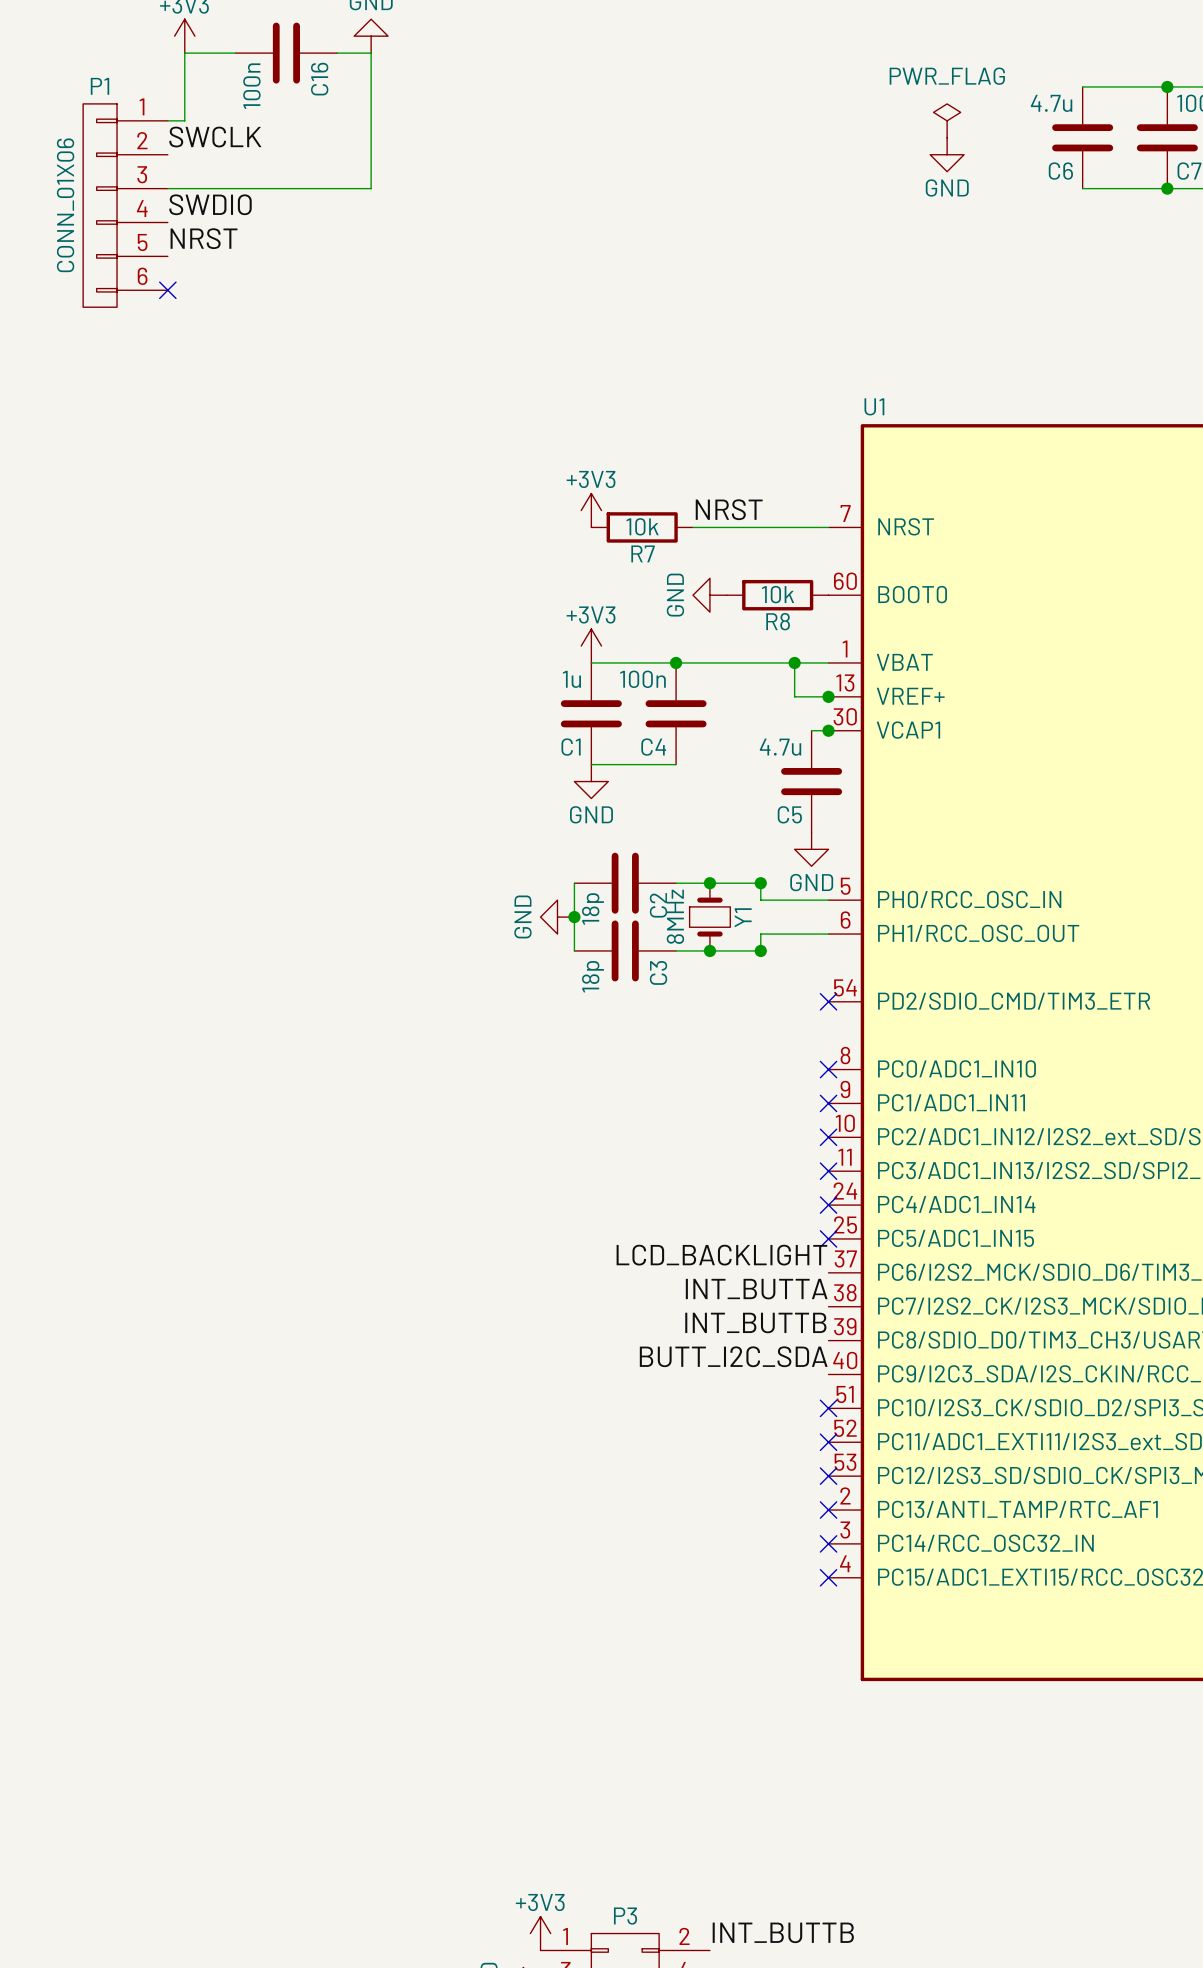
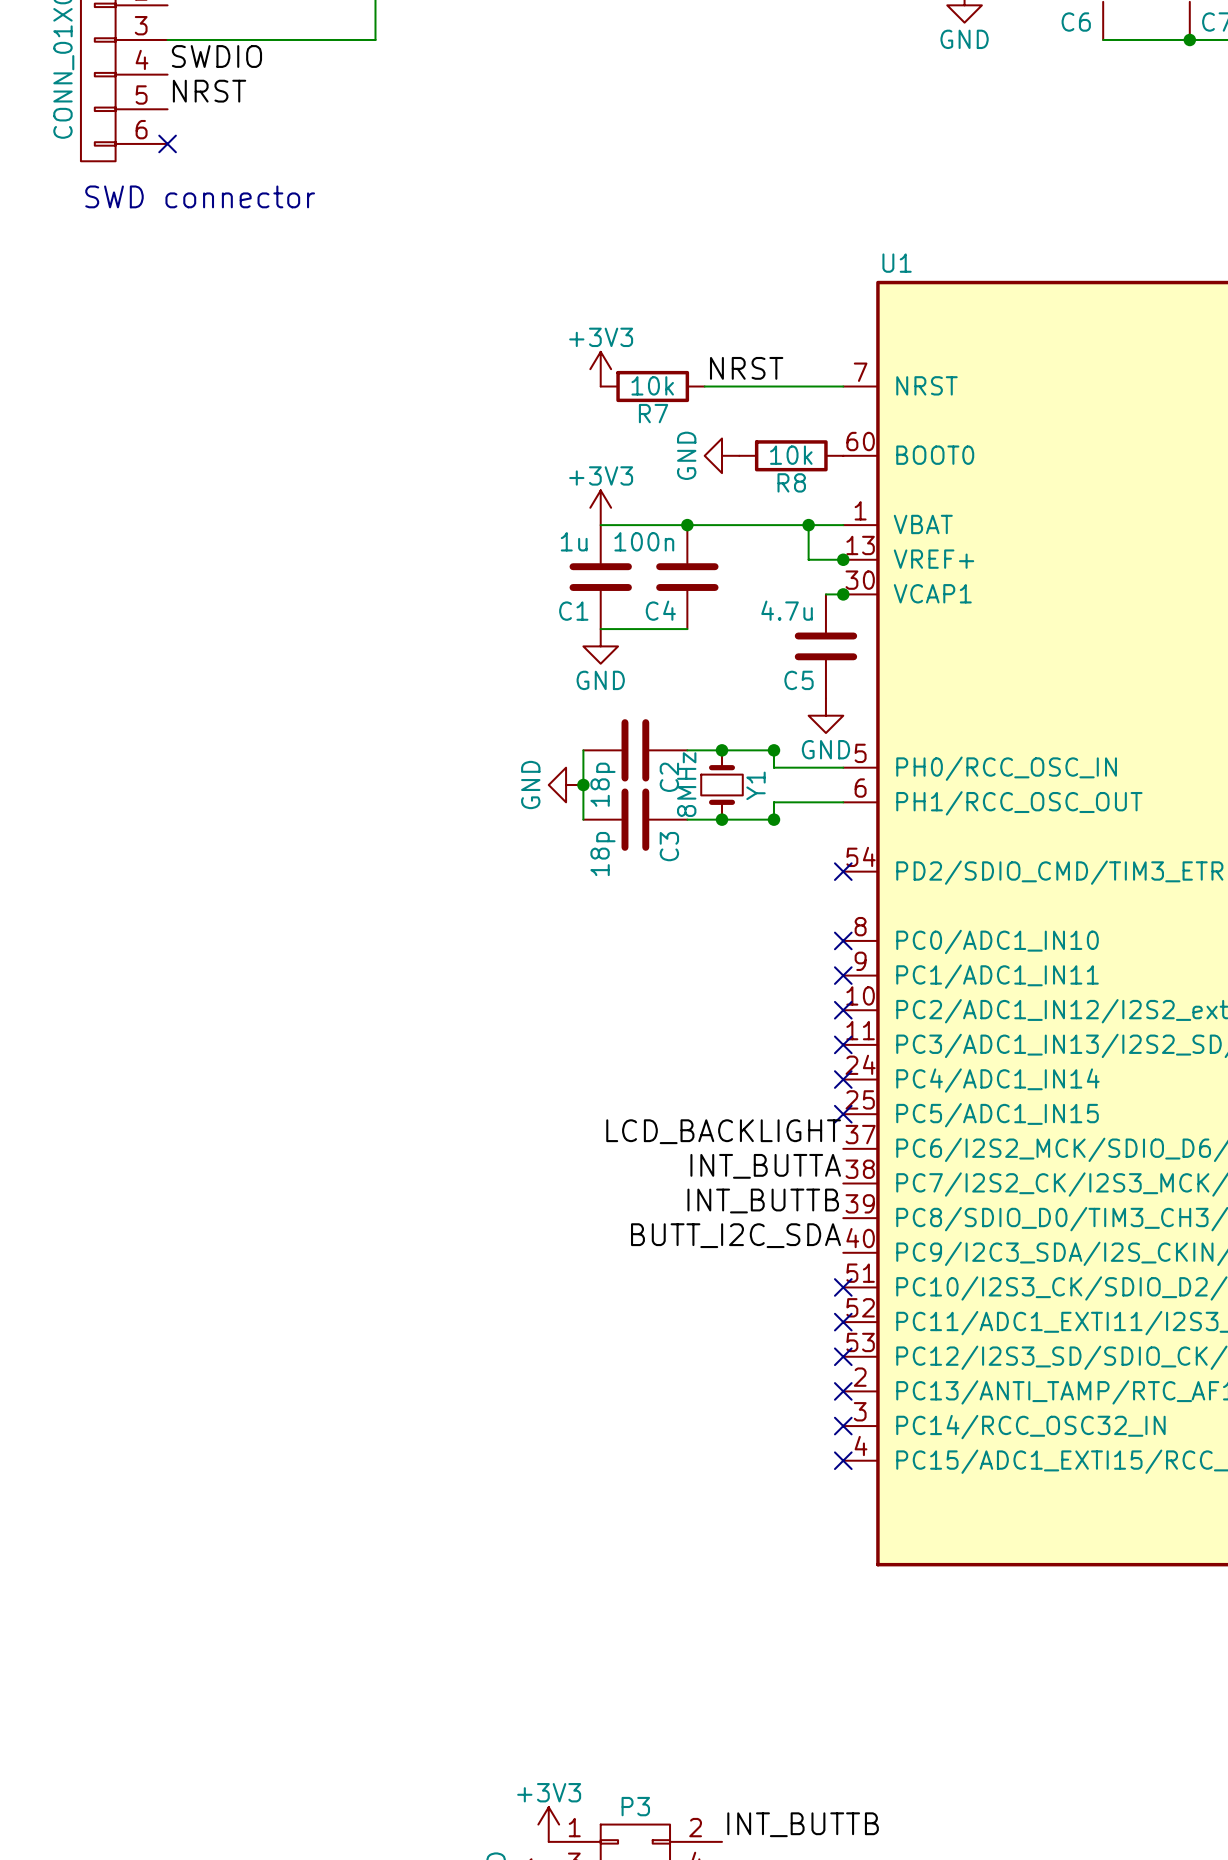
text: none -> SWD connector (200, 196)

